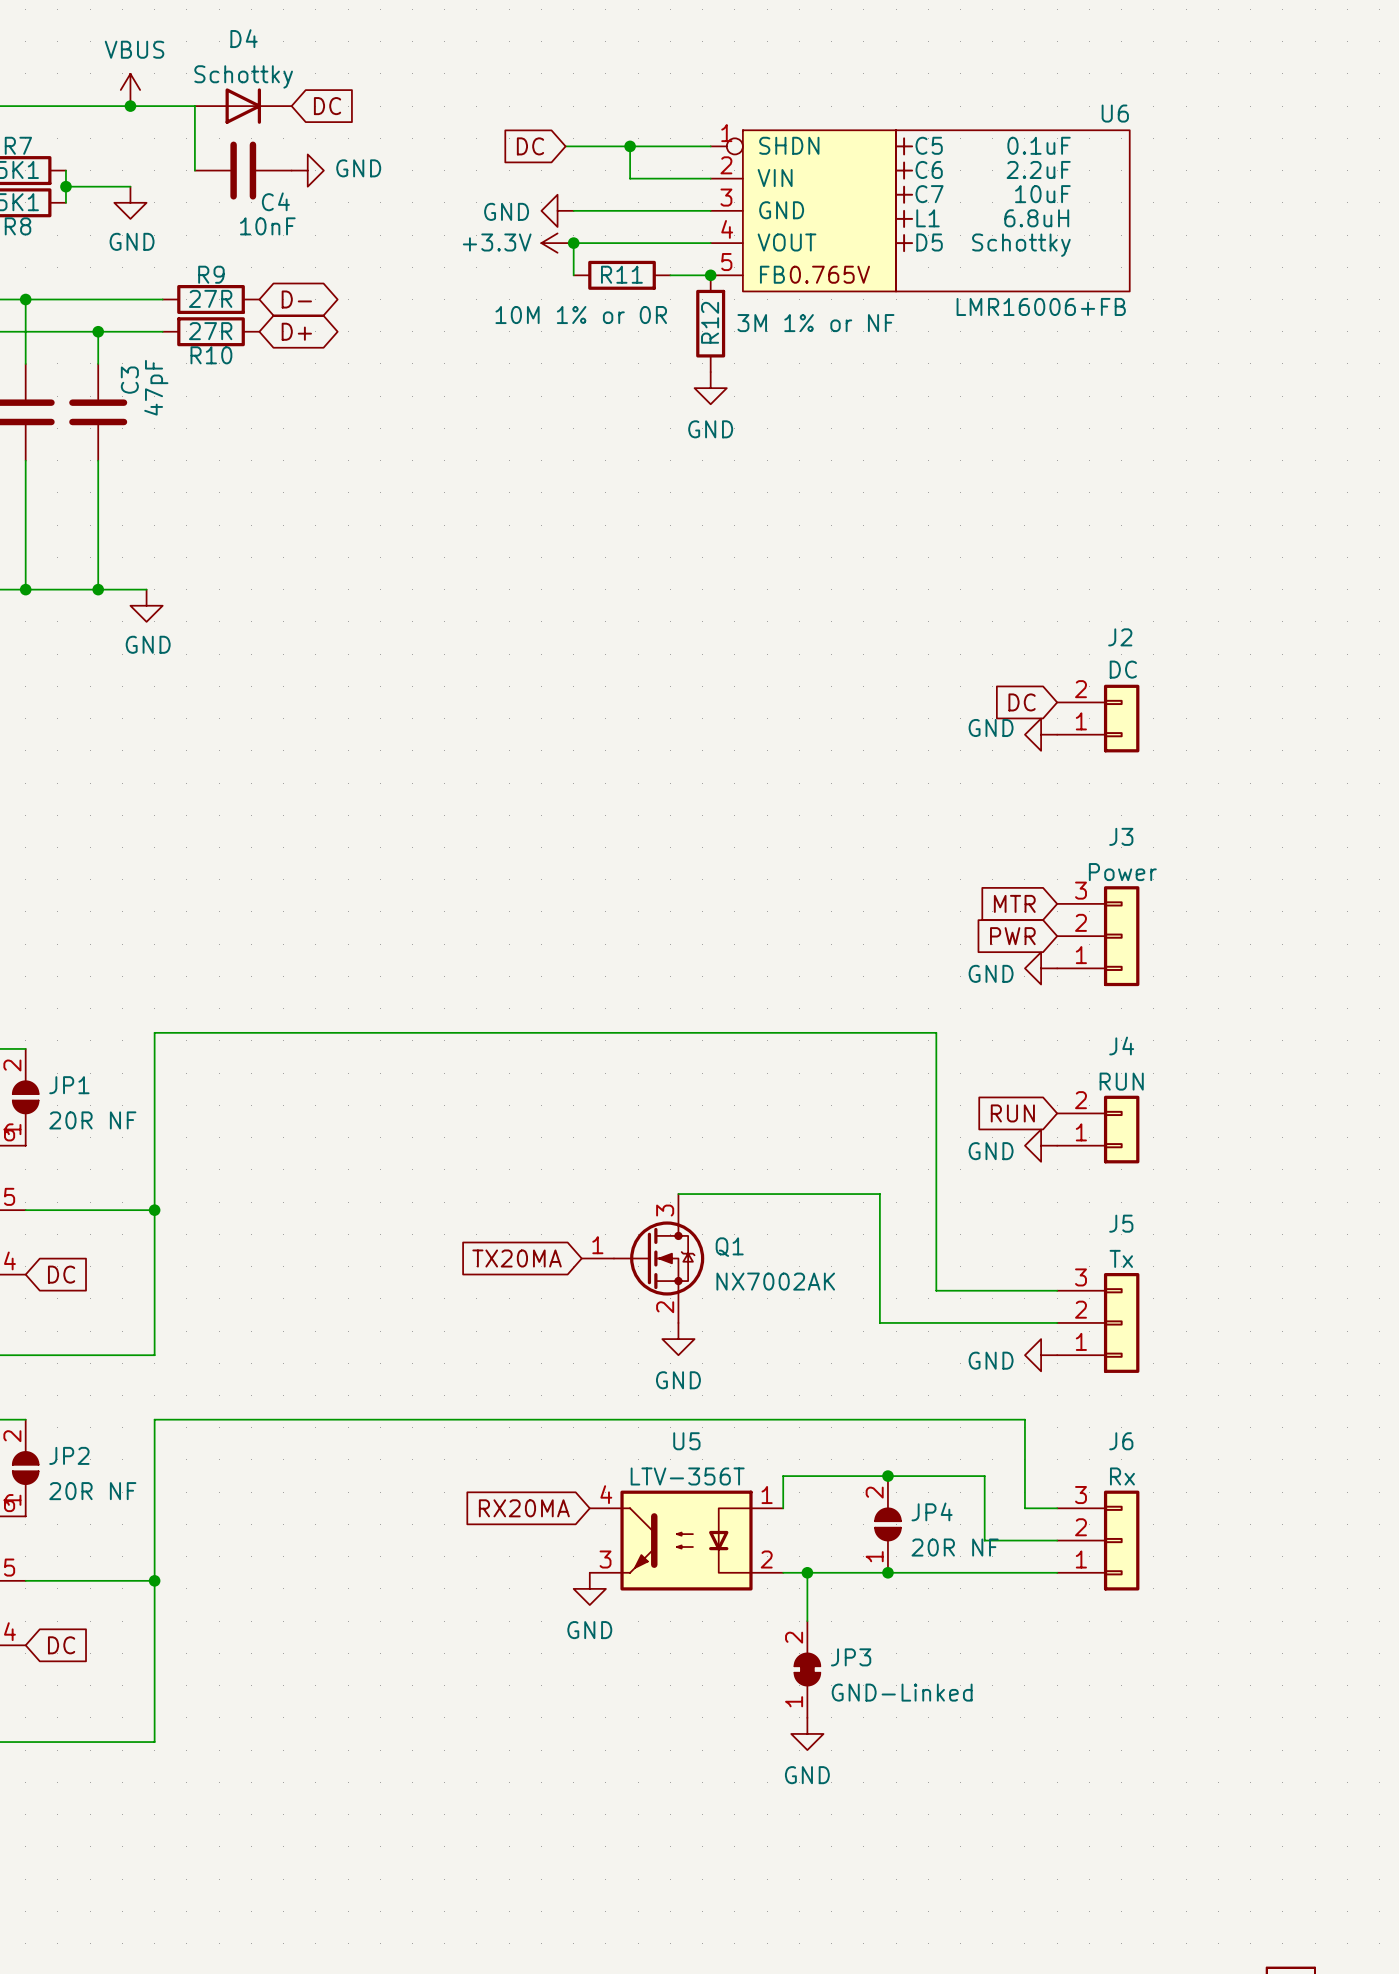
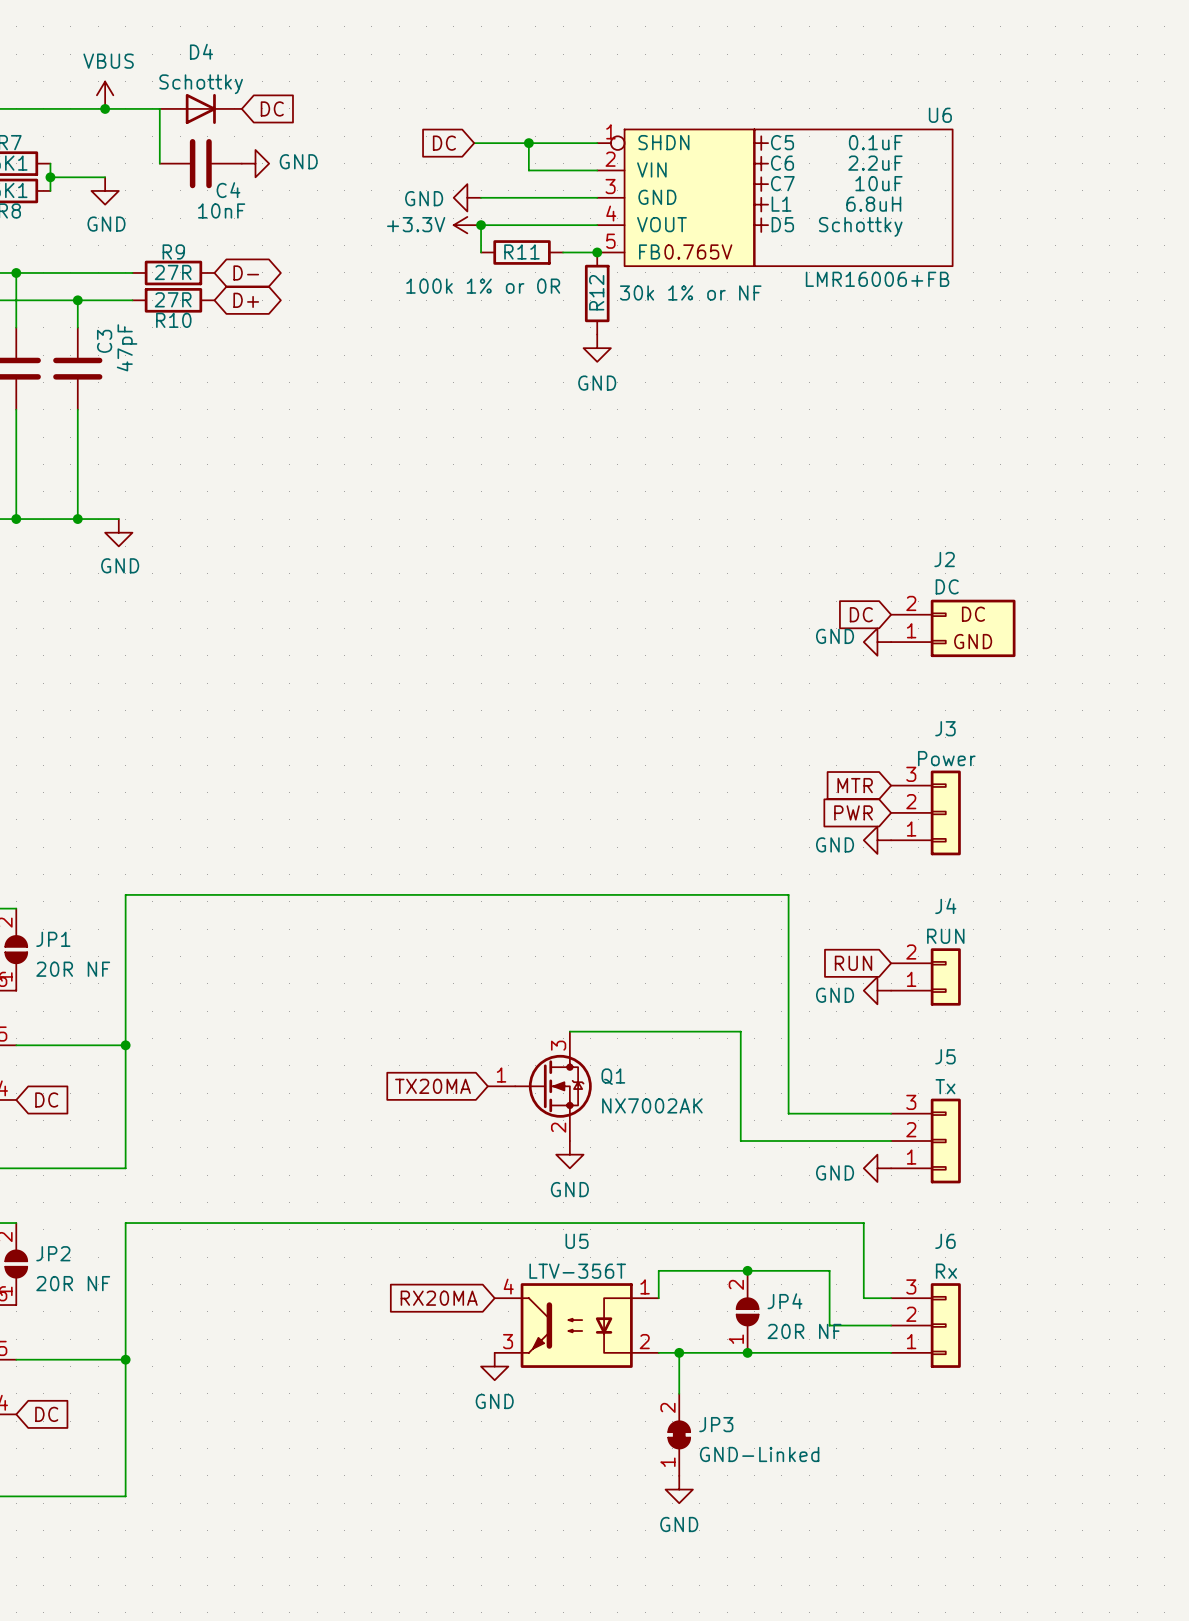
R11 value: 10M 1% or 0R (581, 315) -> 100k 1% or 0R (483, 286)
R12 value: 3M 1% or NF (815, 323) -> 30k 1% or NF (690, 292)
J2 symbol: [1057, 684, 1140, 753] -> [891, 599, 1016, 658]

